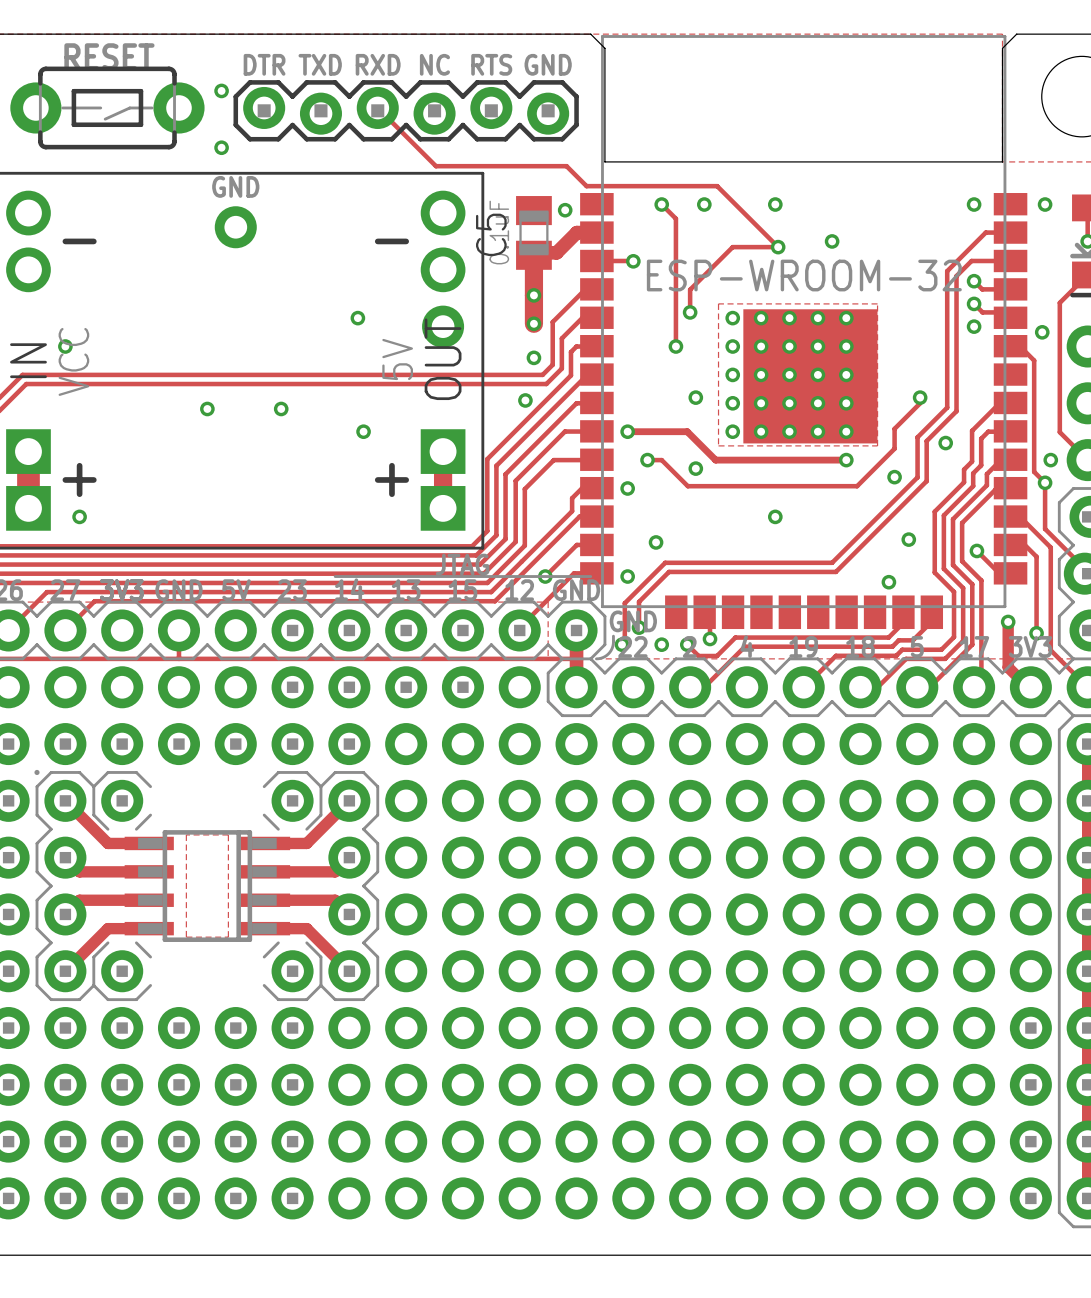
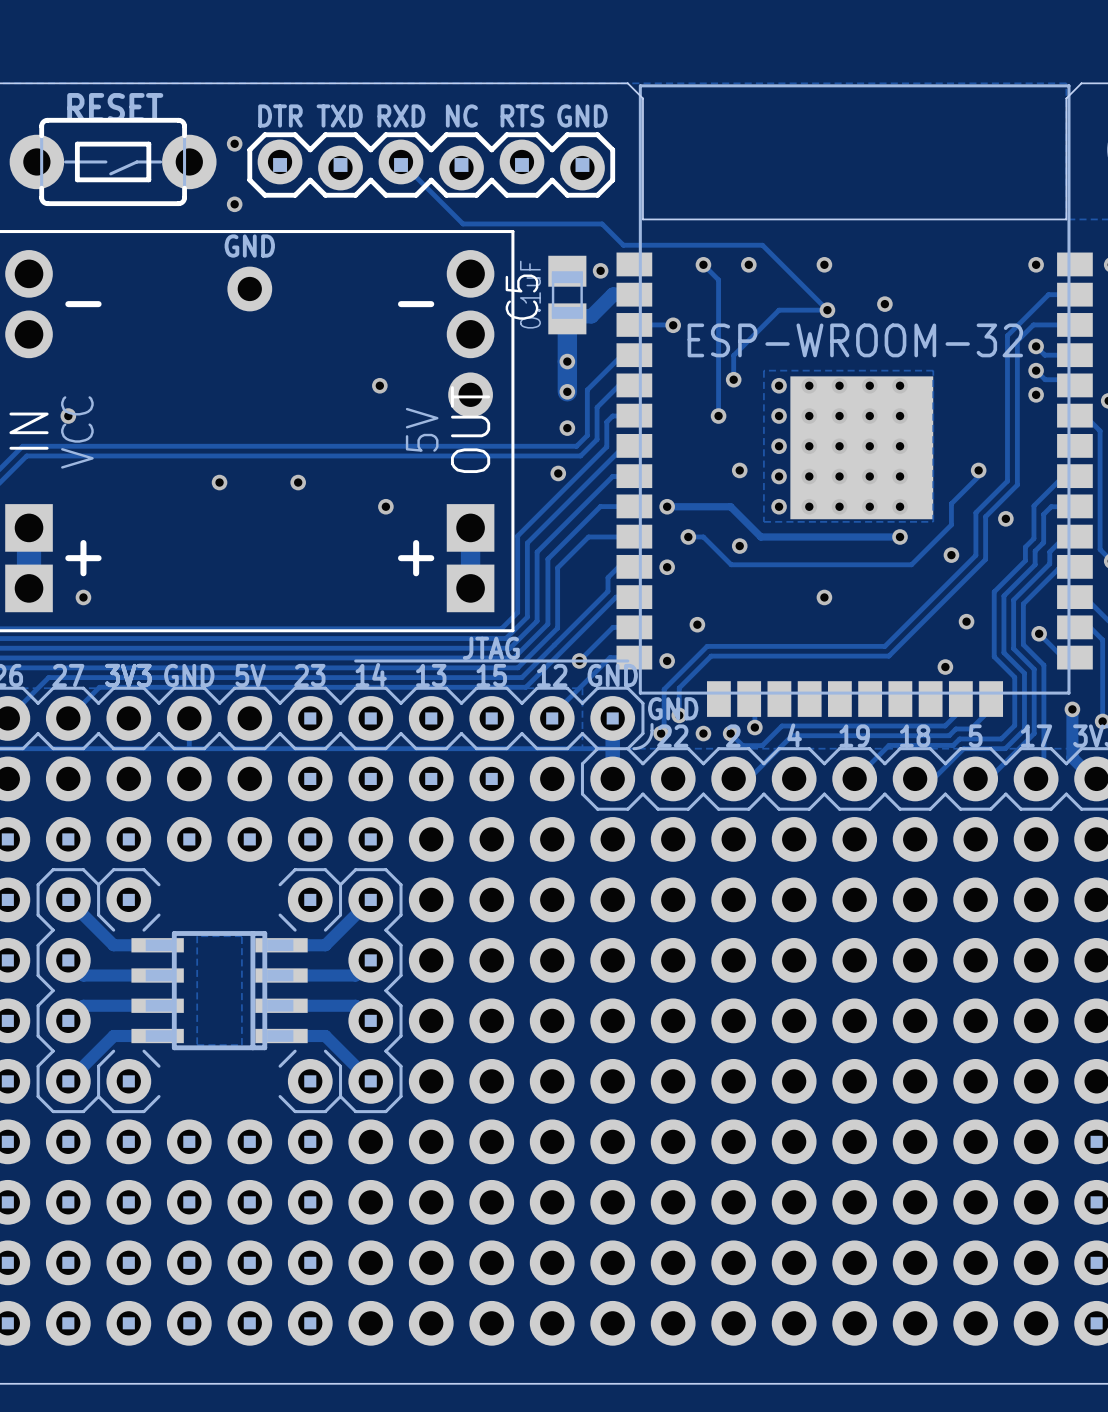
drawing: [34, 769, 40, 776] -> none

